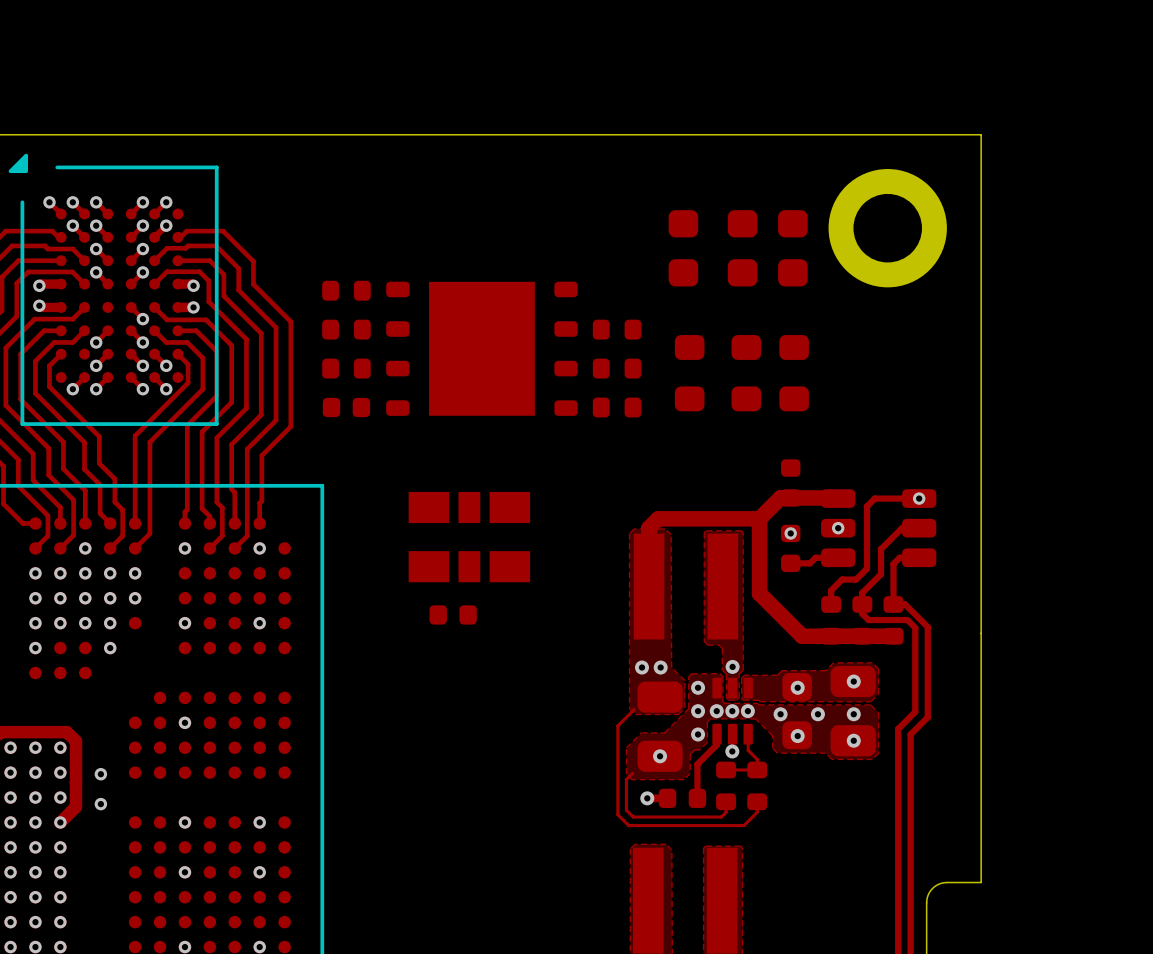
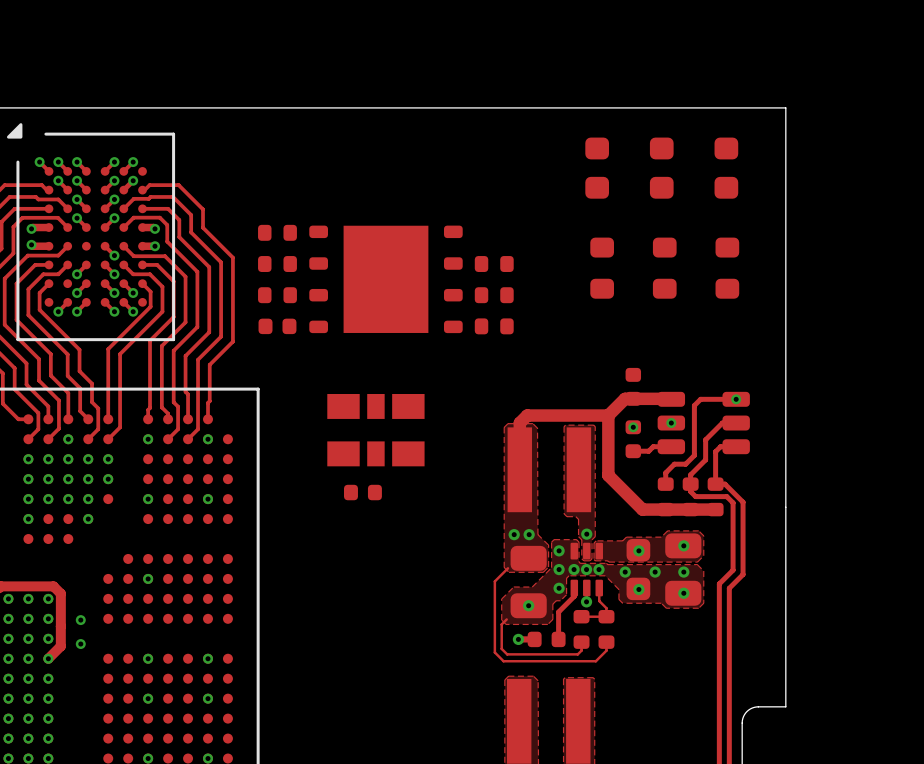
part footprint: [828, 169, 947, 288] -> [714, 137, 739, 199]
part: none -> (597, 168)
part: none -> (661, 168)
part: (683, 248) -> none
part: (742, 248) -> none
part: (792, 248) -> none
part: none -> (602, 268)
part: none -> (664, 268)
part: none -> (727, 268)
part: (689, 373) -> none
part: (746, 373) -> none
part: (794, 373) -> none

